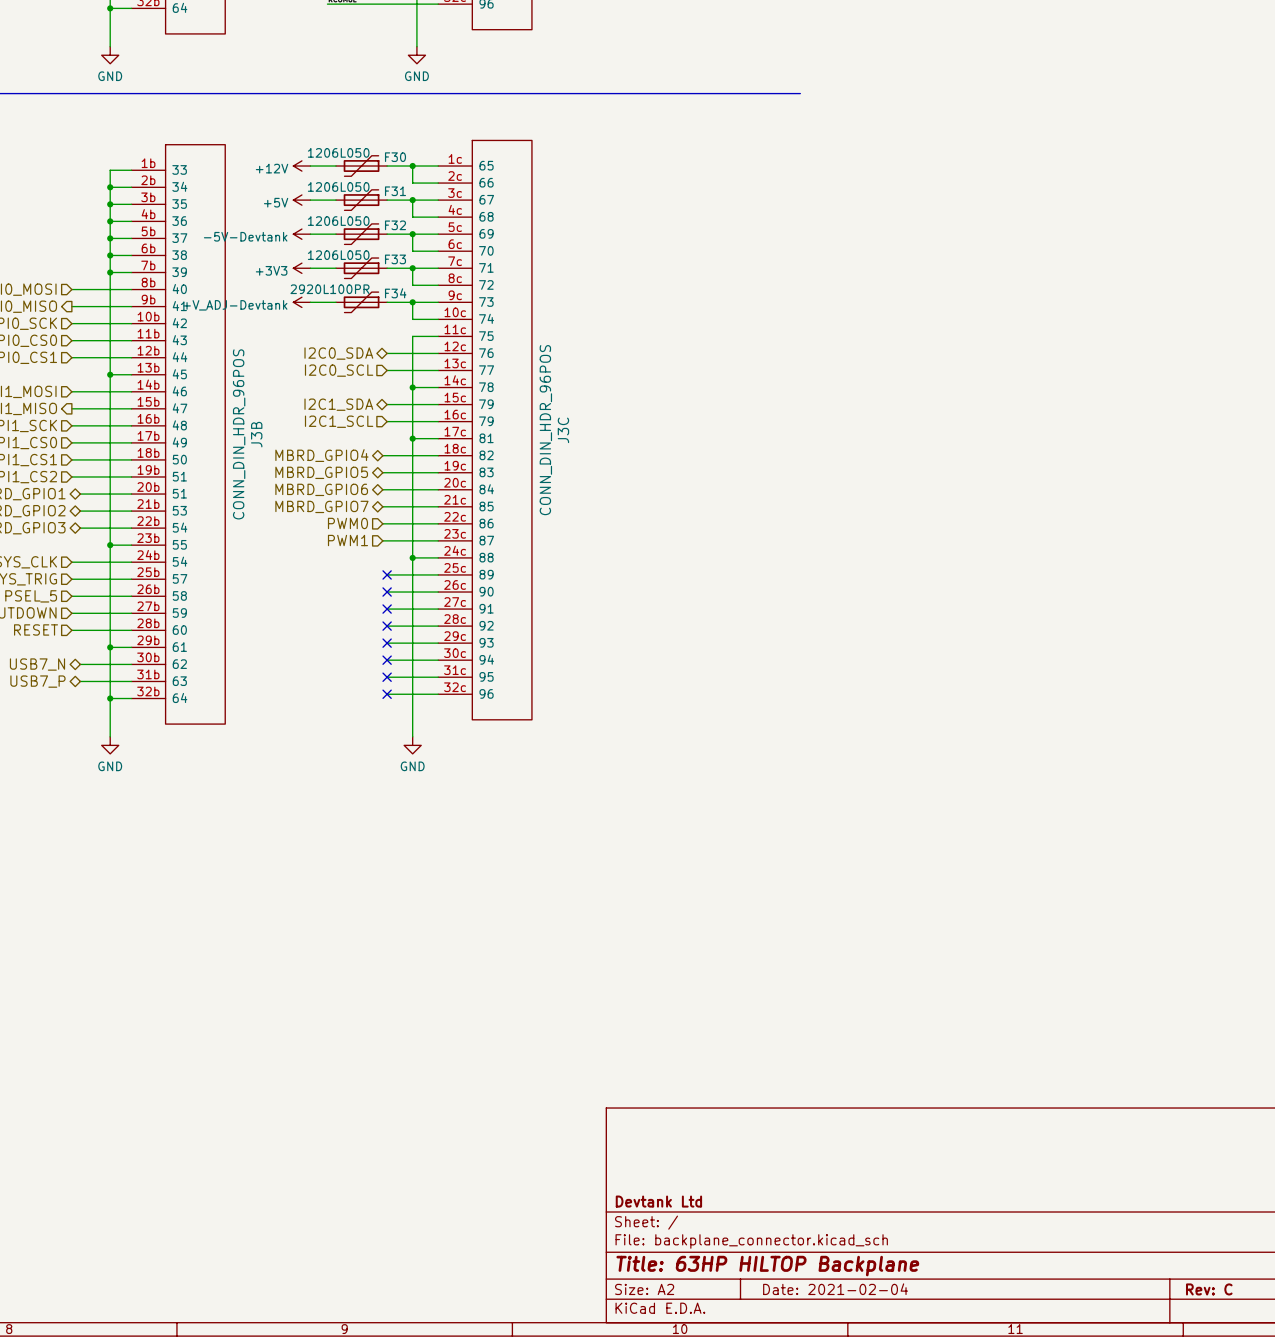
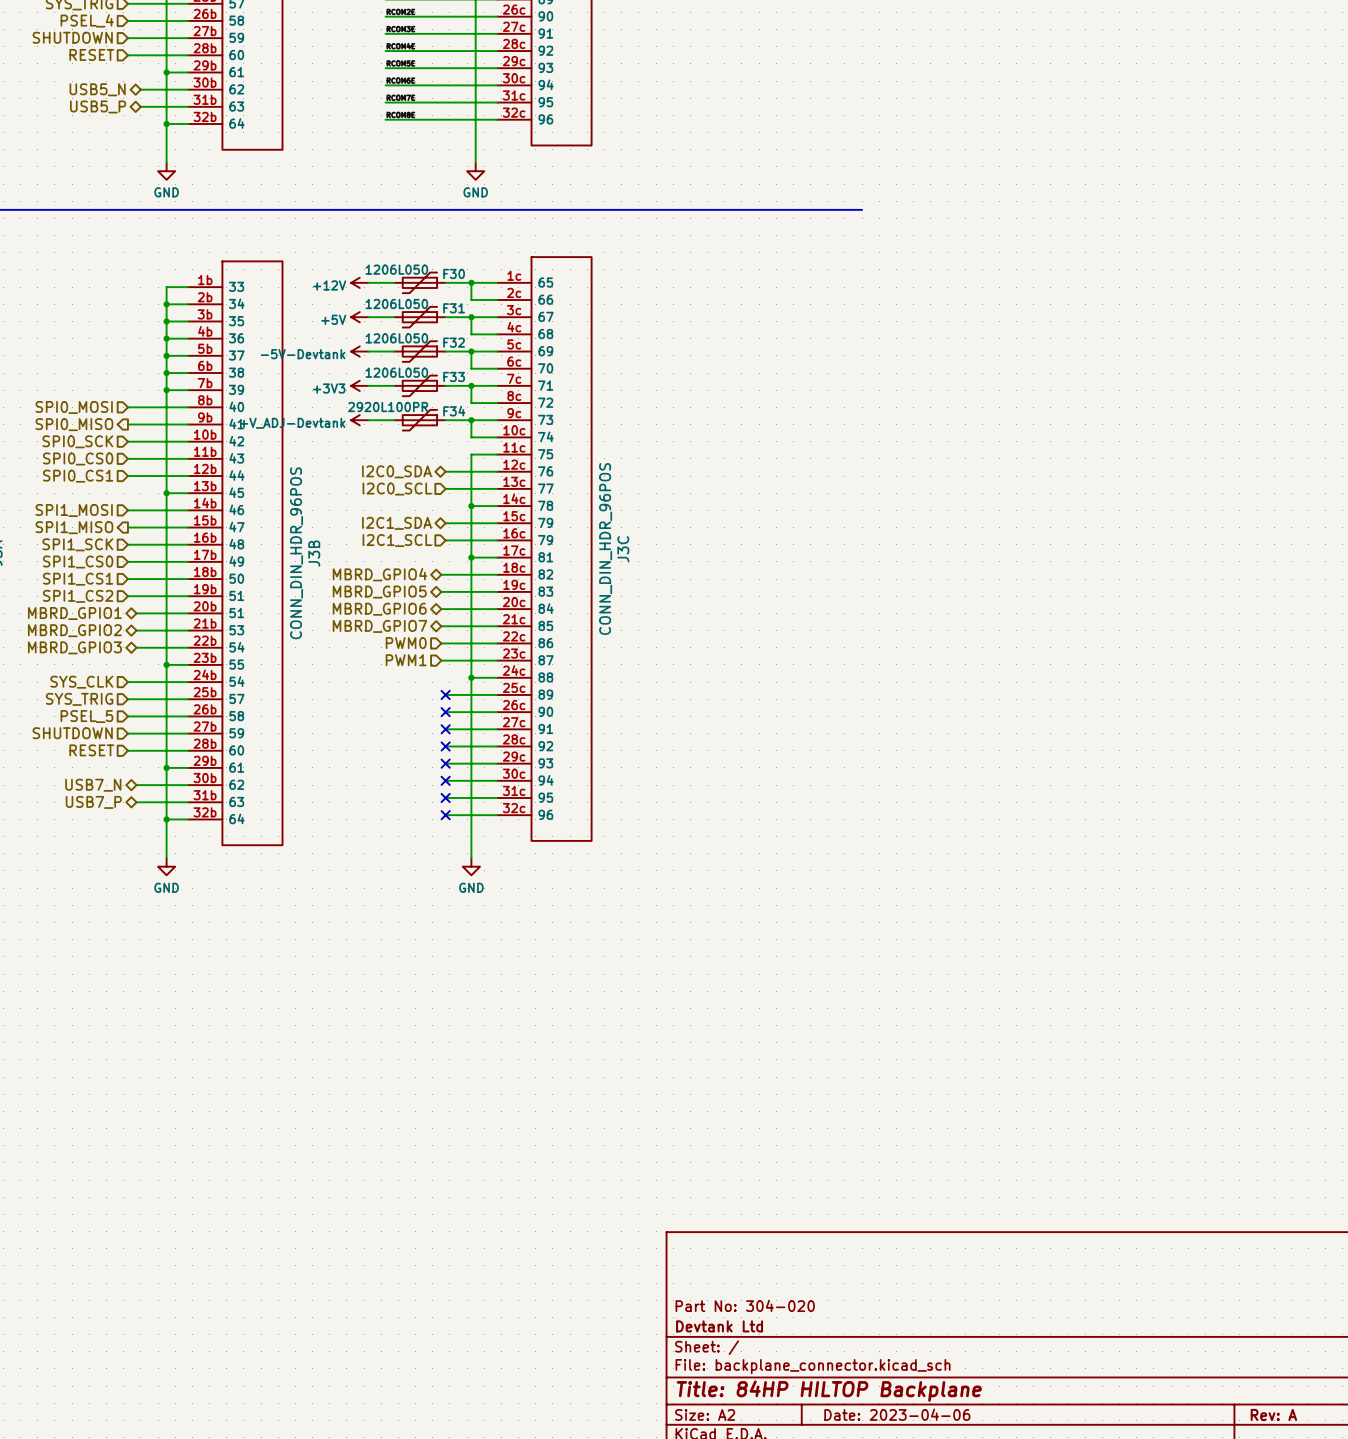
title block: none -> Part No: 304-020 (745, 1305)
title block: Title: 63HP HILTOP Backplane (767, 1266) -> Title: 84HP HILTOP Backplane (829, 1391)
title block: Date: 2021-02-04 (835, 1289) -> Date: 2023-04-06 (897, 1414)
title block: Rev: C (1209, 1289) -> Rev: A (1273, 1414)

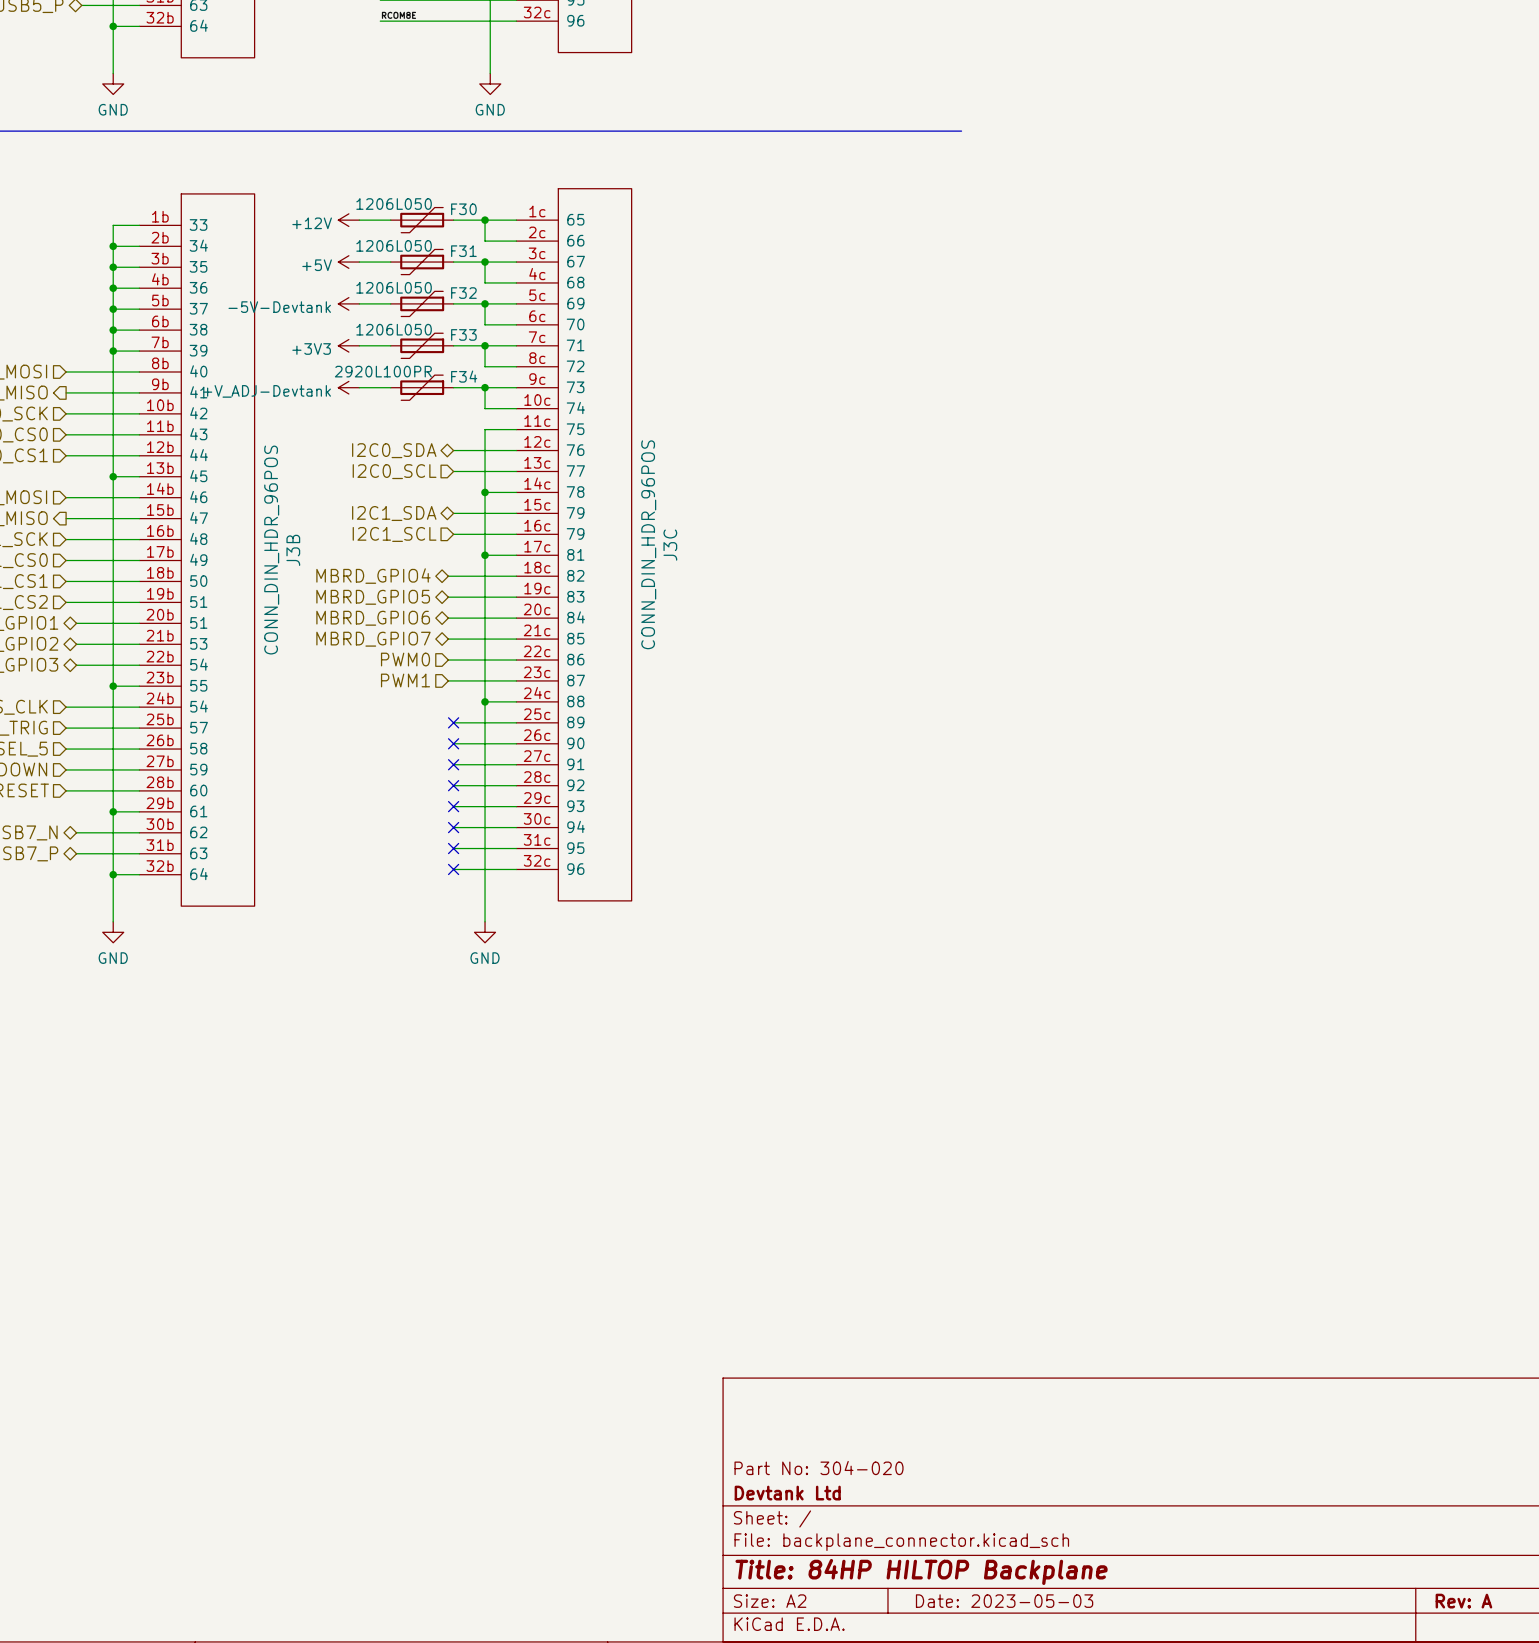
title block: Date: 2023-04-06 (897, 1414) -> Date: 2023-05-03 (1004, 1601)

